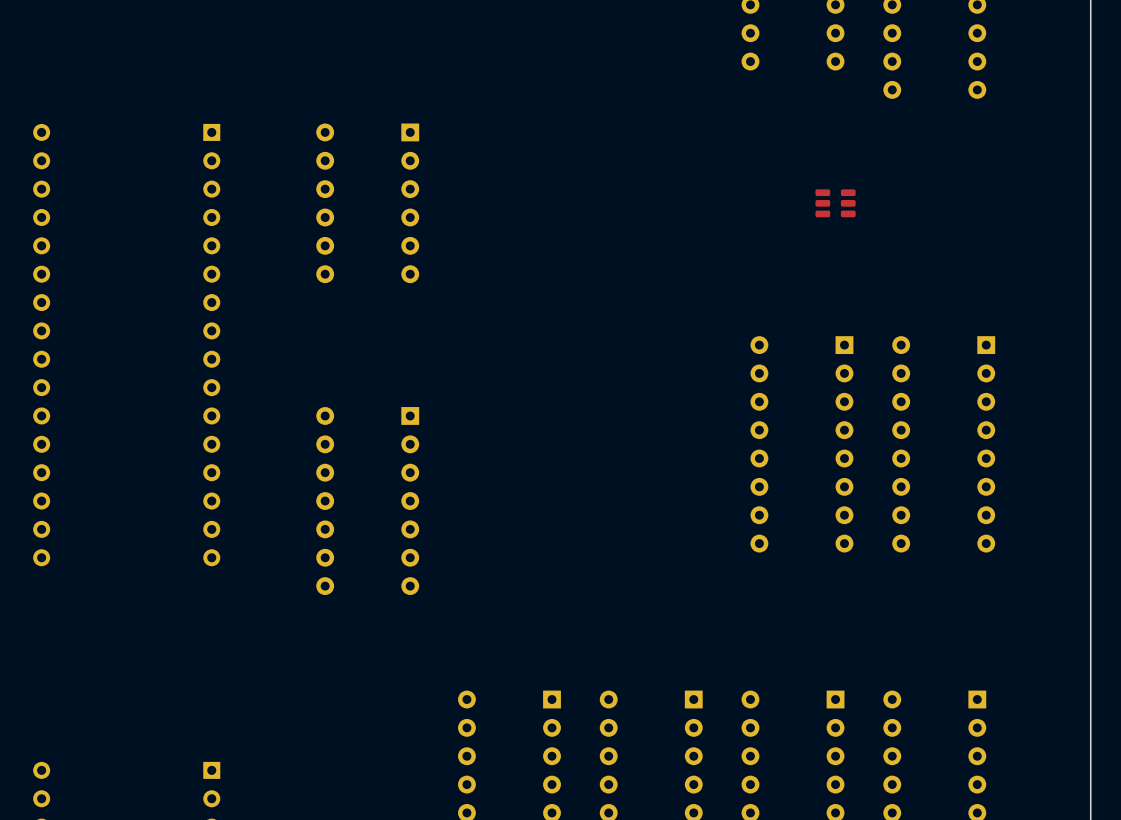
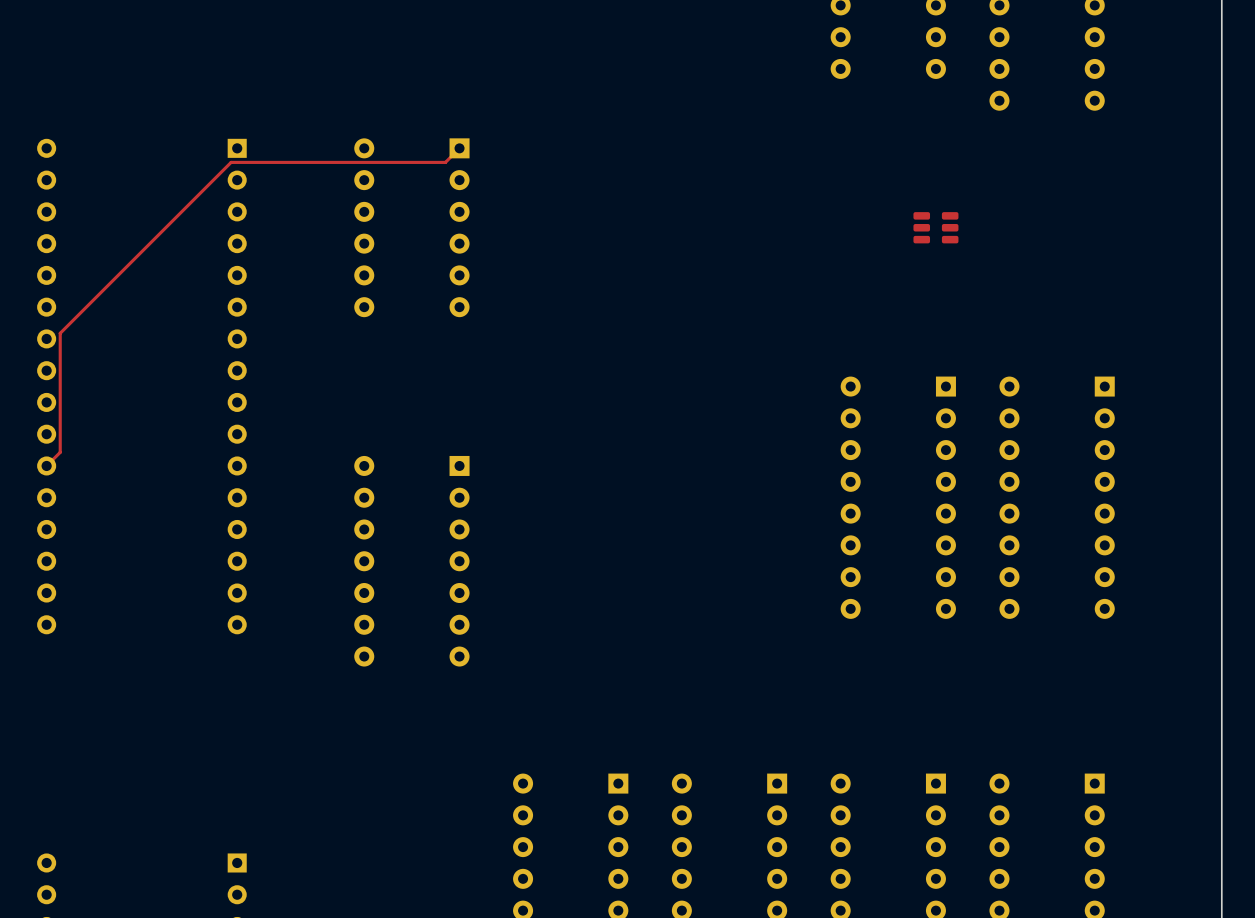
top track: none -> (459, 148) (445, 162) (231, 162) (60, 333) (60, 452) (46, 465)

